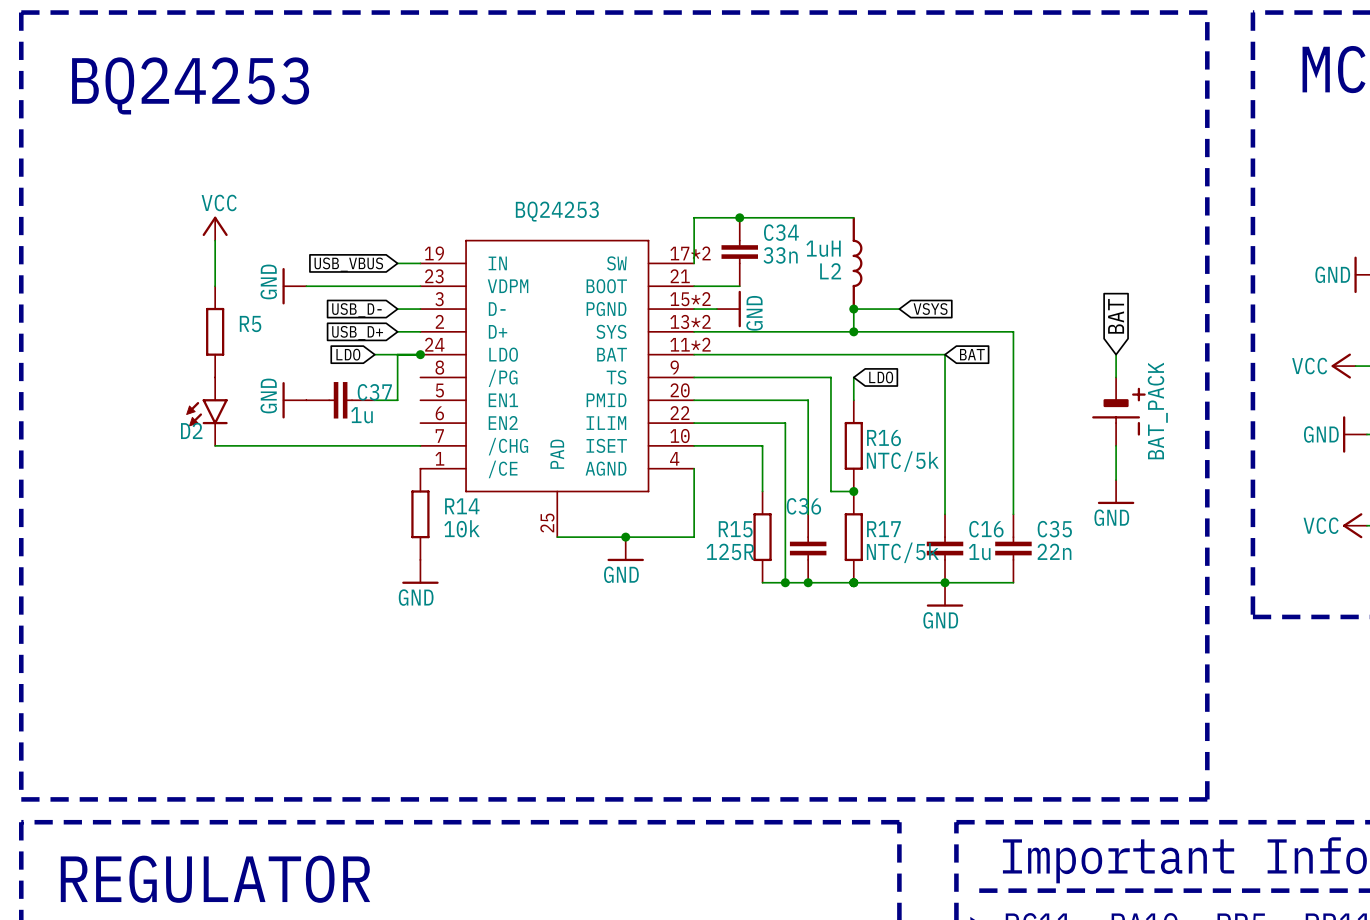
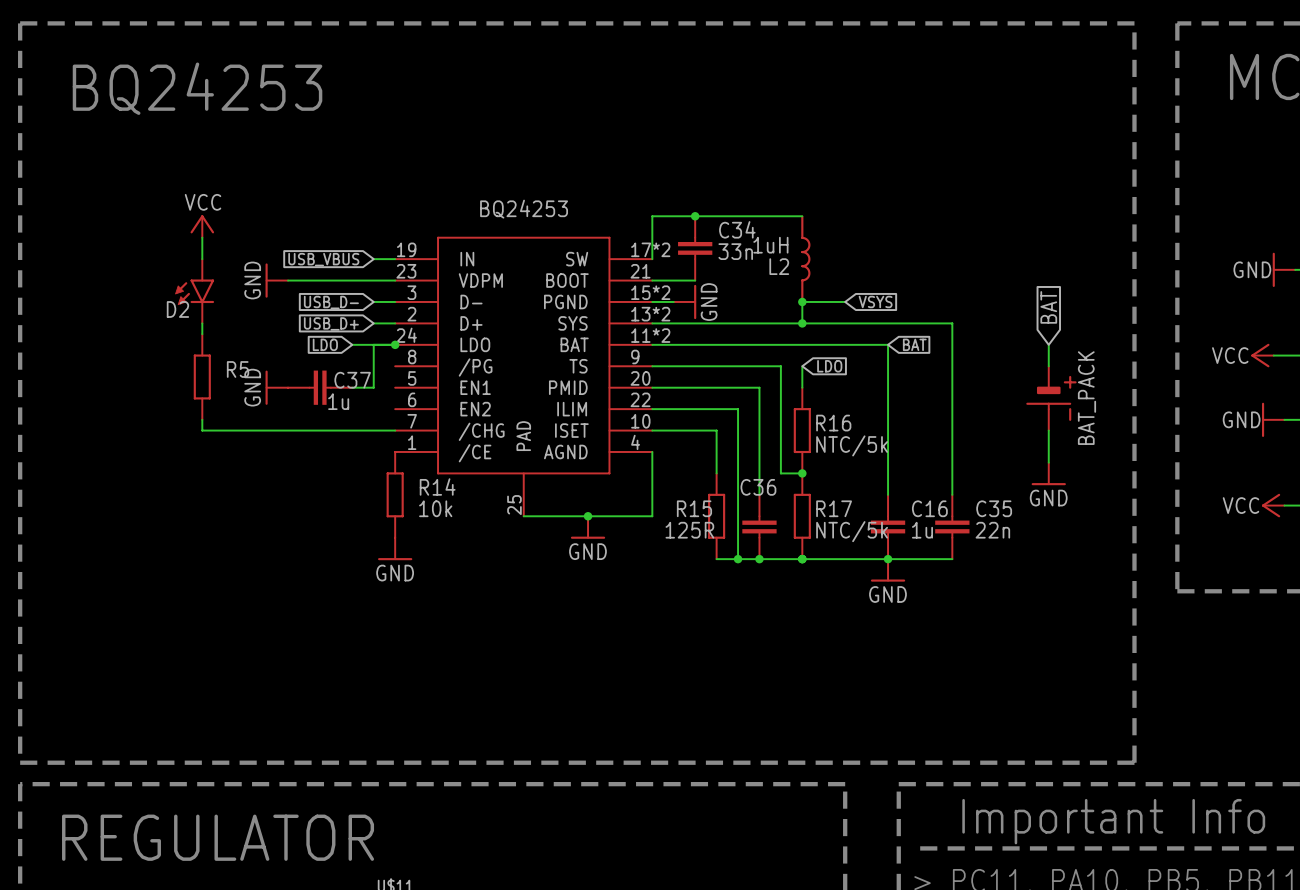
wire: none -> (202, 323) (202, 334)
R5 position: (215, 331) -> (202, 376)
D2 symbol: [186, 377, 228, 446] -> [175, 259, 215, 324]

